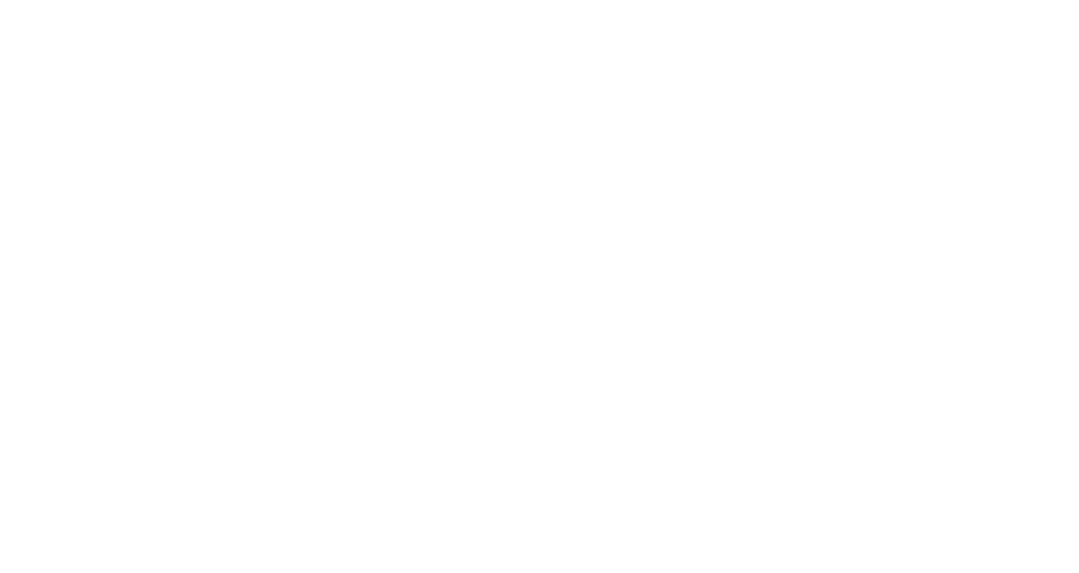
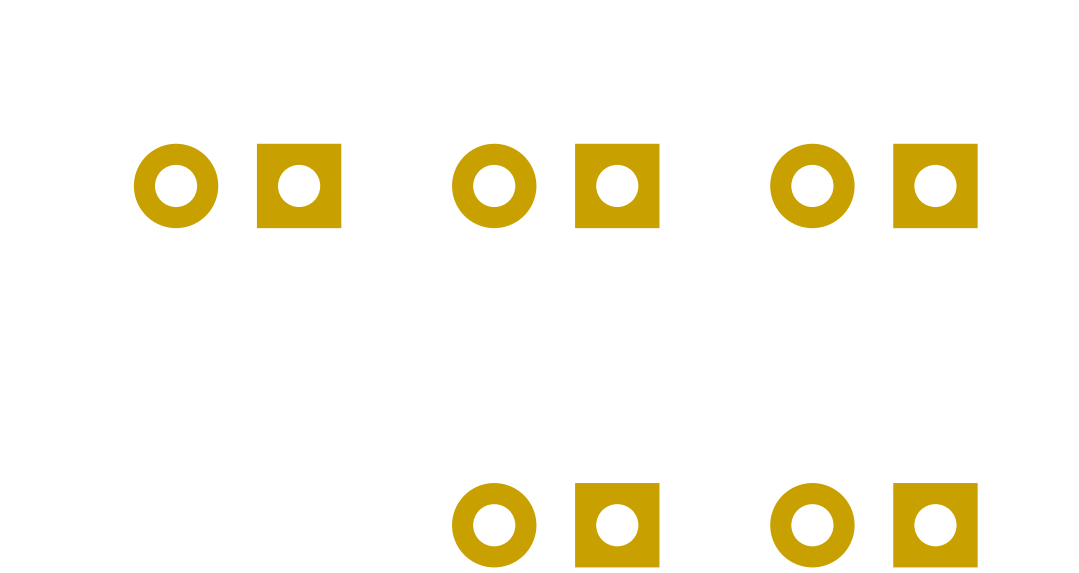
part: none -> (237, 185)
part: none -> (555, 185)
part: none -> (873, 185)
part: none -> (555, 525)
part: none -> (873, 525)

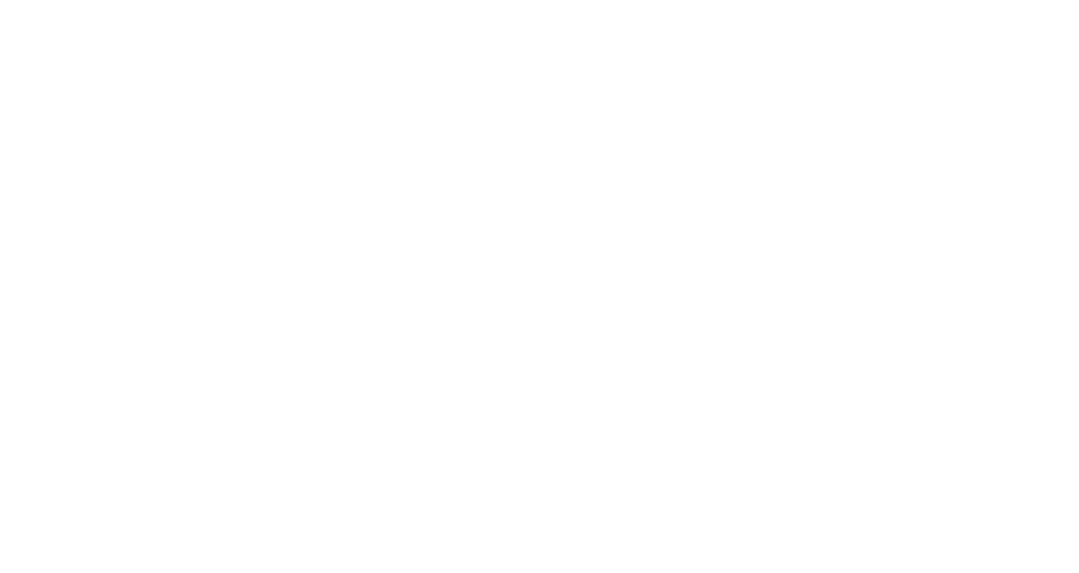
part: (237, 185) -> none
part: (555, 185) -> none
part: (873, 185) -> none
part: (555, 525) -> none
part: (873, 525) -> none

